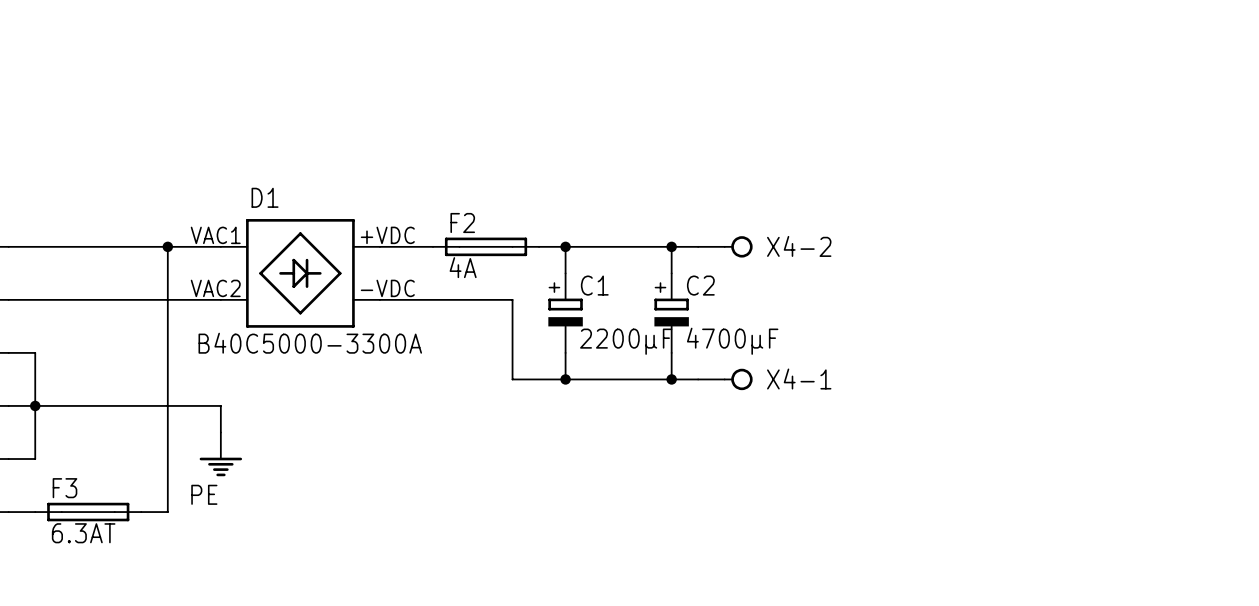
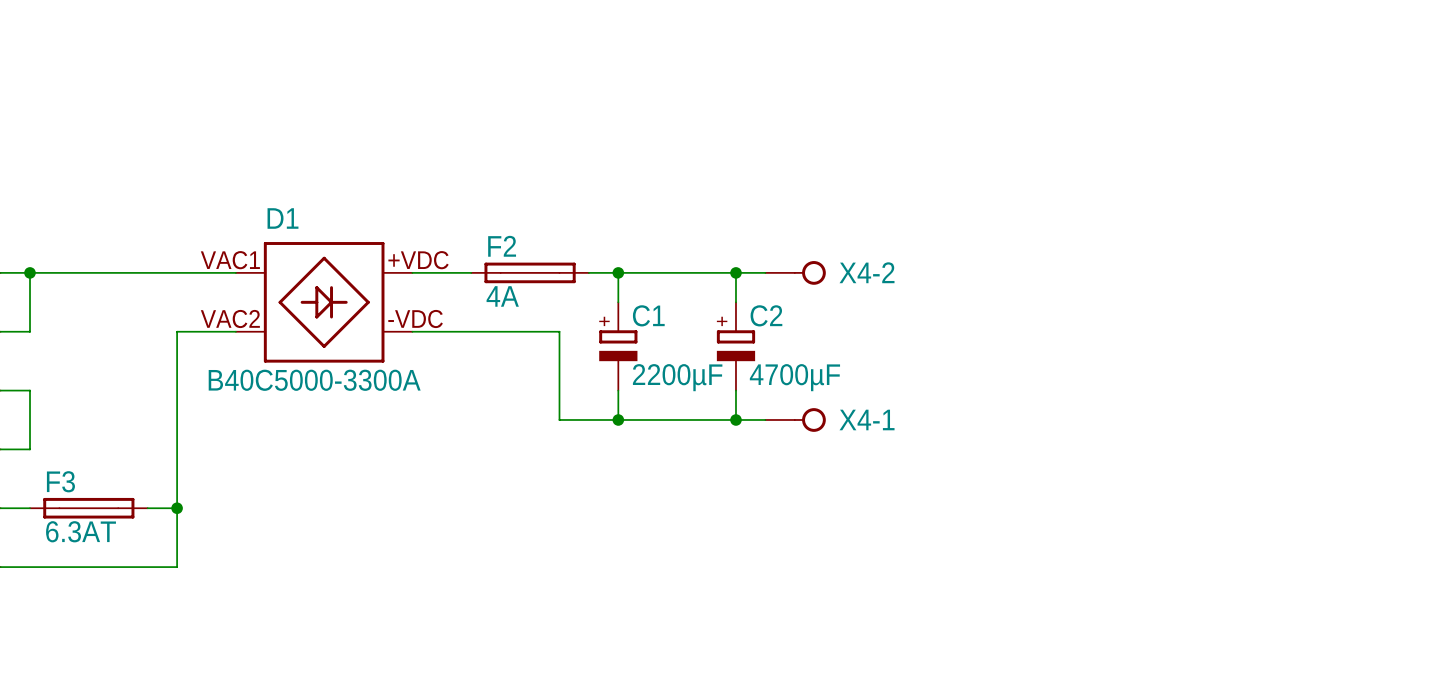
junction: none -> (30, 272)
wire: (167, 246) (167, 299) (35, 299) -> (30, 272) (30, 331)
junction: (167, 246) -> none
junction: (35, 405) -> none
wire: (220, 432) (220, 405) (35, 405) (35, 459) -> none
power symbol: PE (220, 454) -> none
wire: none -> (147, 508) (177, 508)
junction: none -> (177, 508)
F3 position: (88, 512) -> (88, 508)

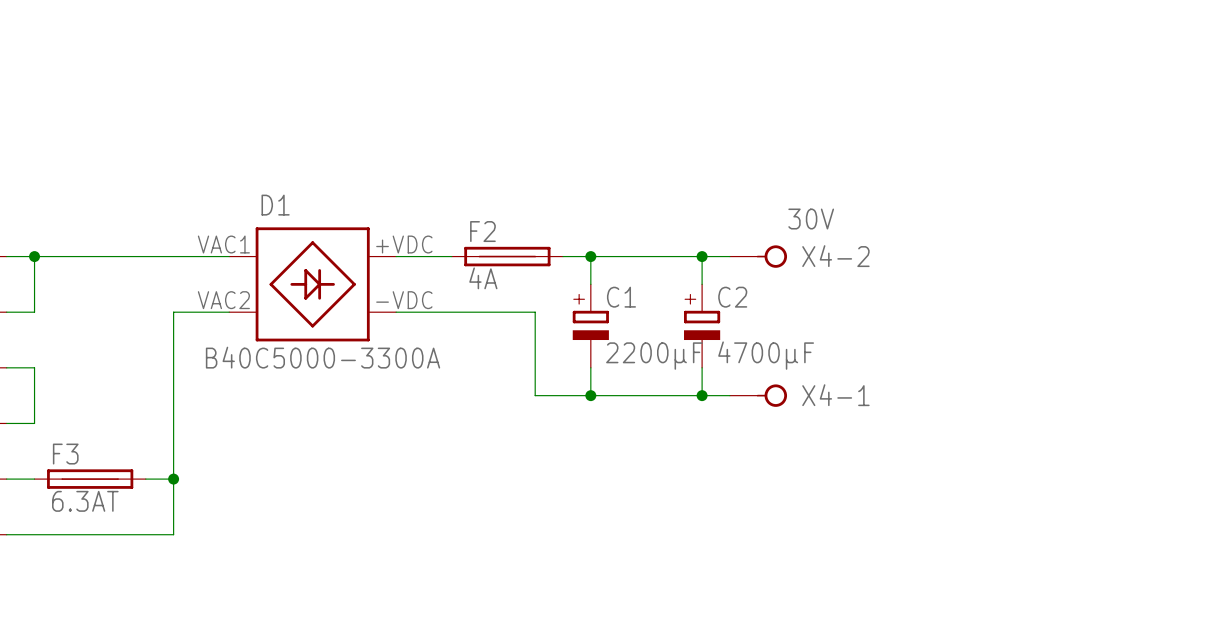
X4-2 value: none -> 30V (811, 219)

